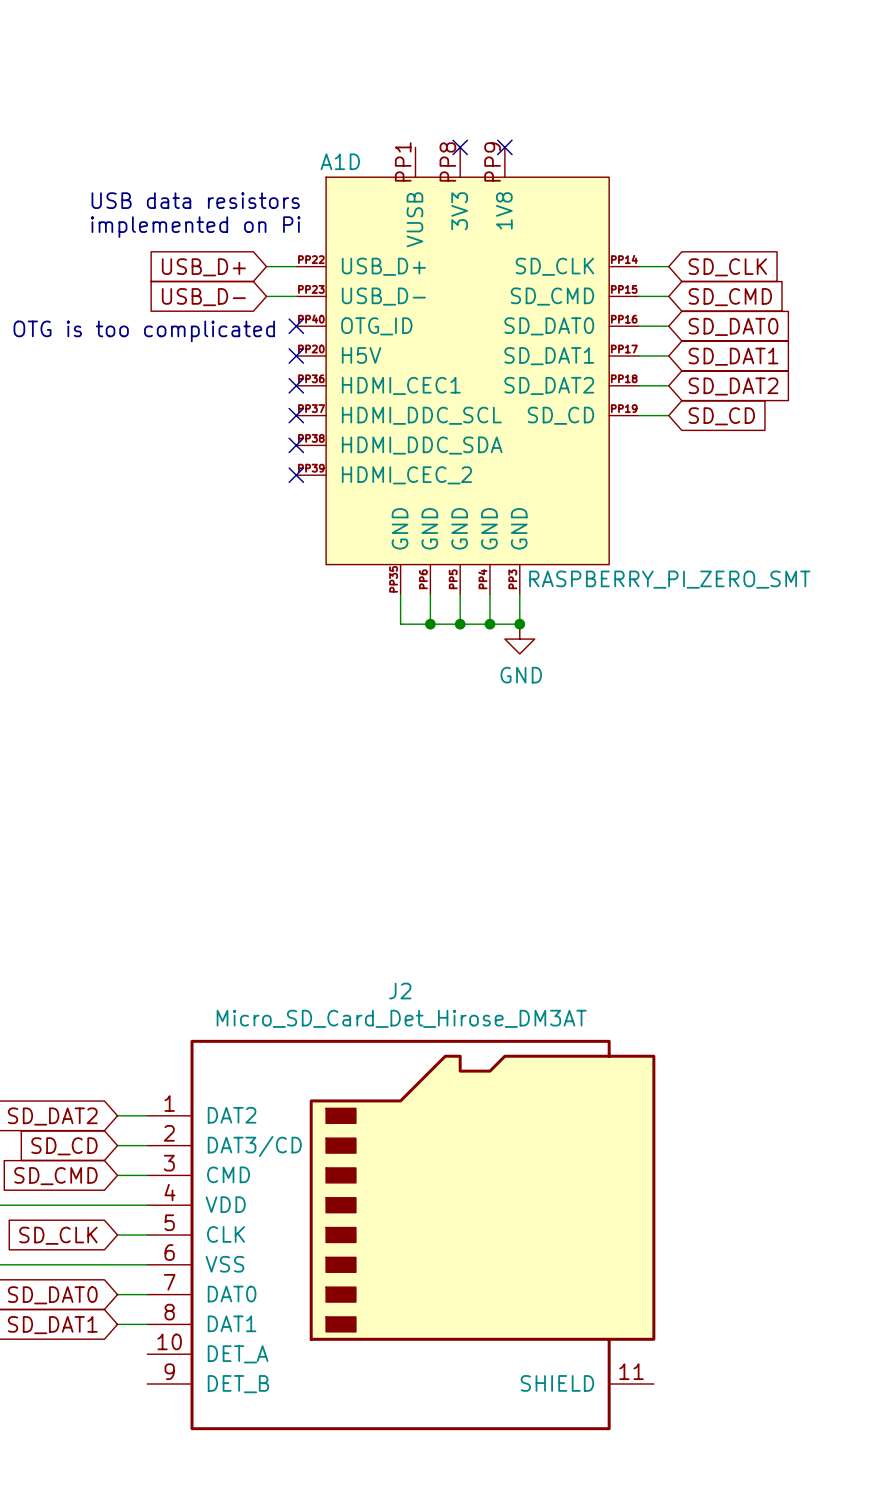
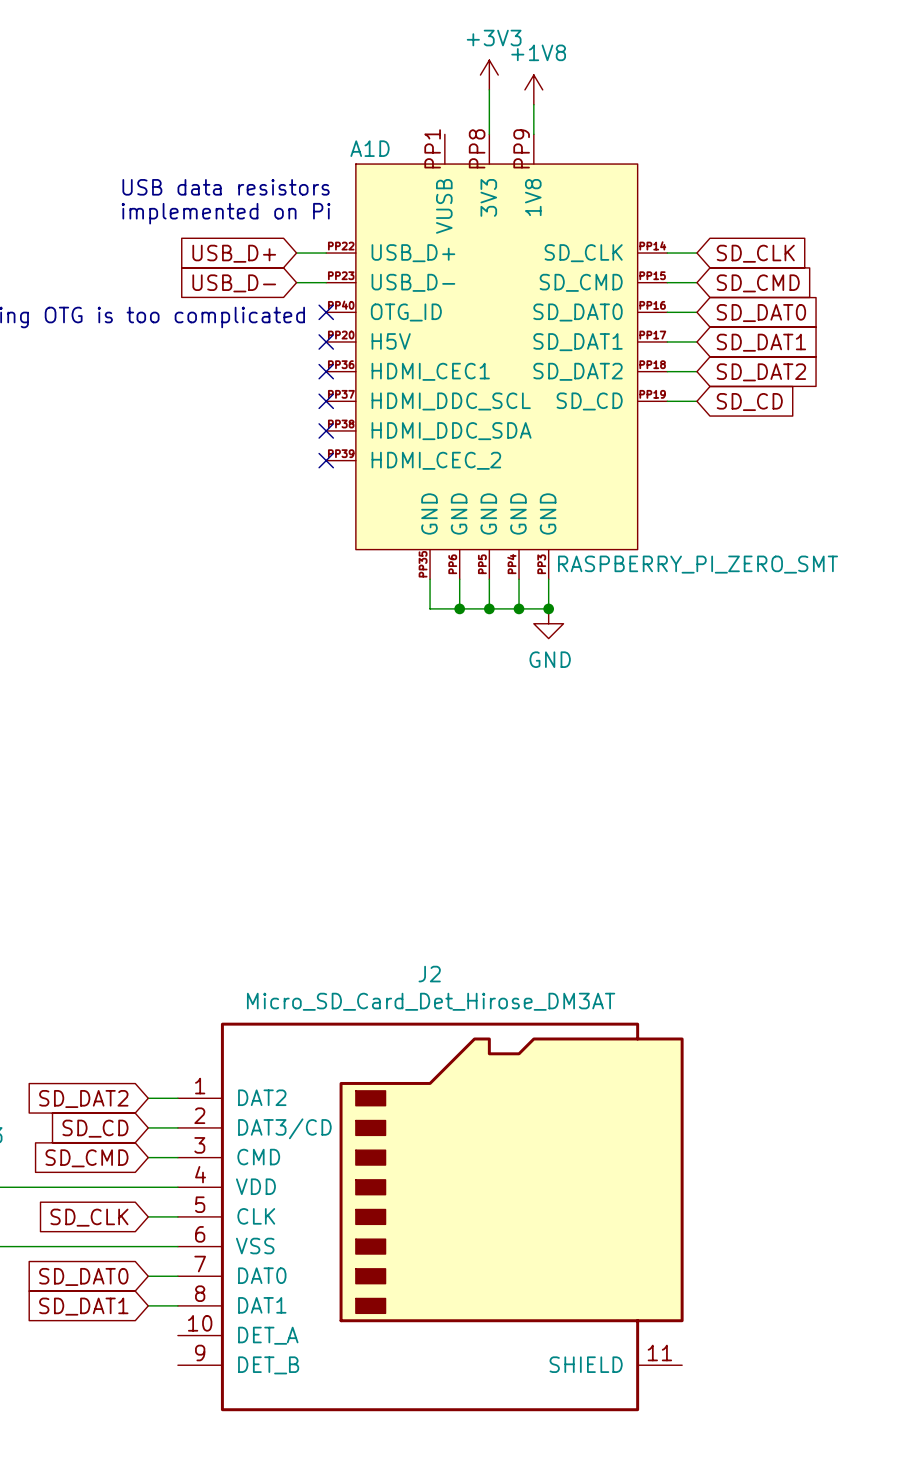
power symbol: none -> +3V3 (489, 75)
wire: none -> (489, 89) (489, 134)
power symbol: none -> +1V8 (533, 89)
wire: none -> (533, 104) (533, 134)
no-connect mark: (460, 147) -> none
no-connect mark: (504, 147) -> none

